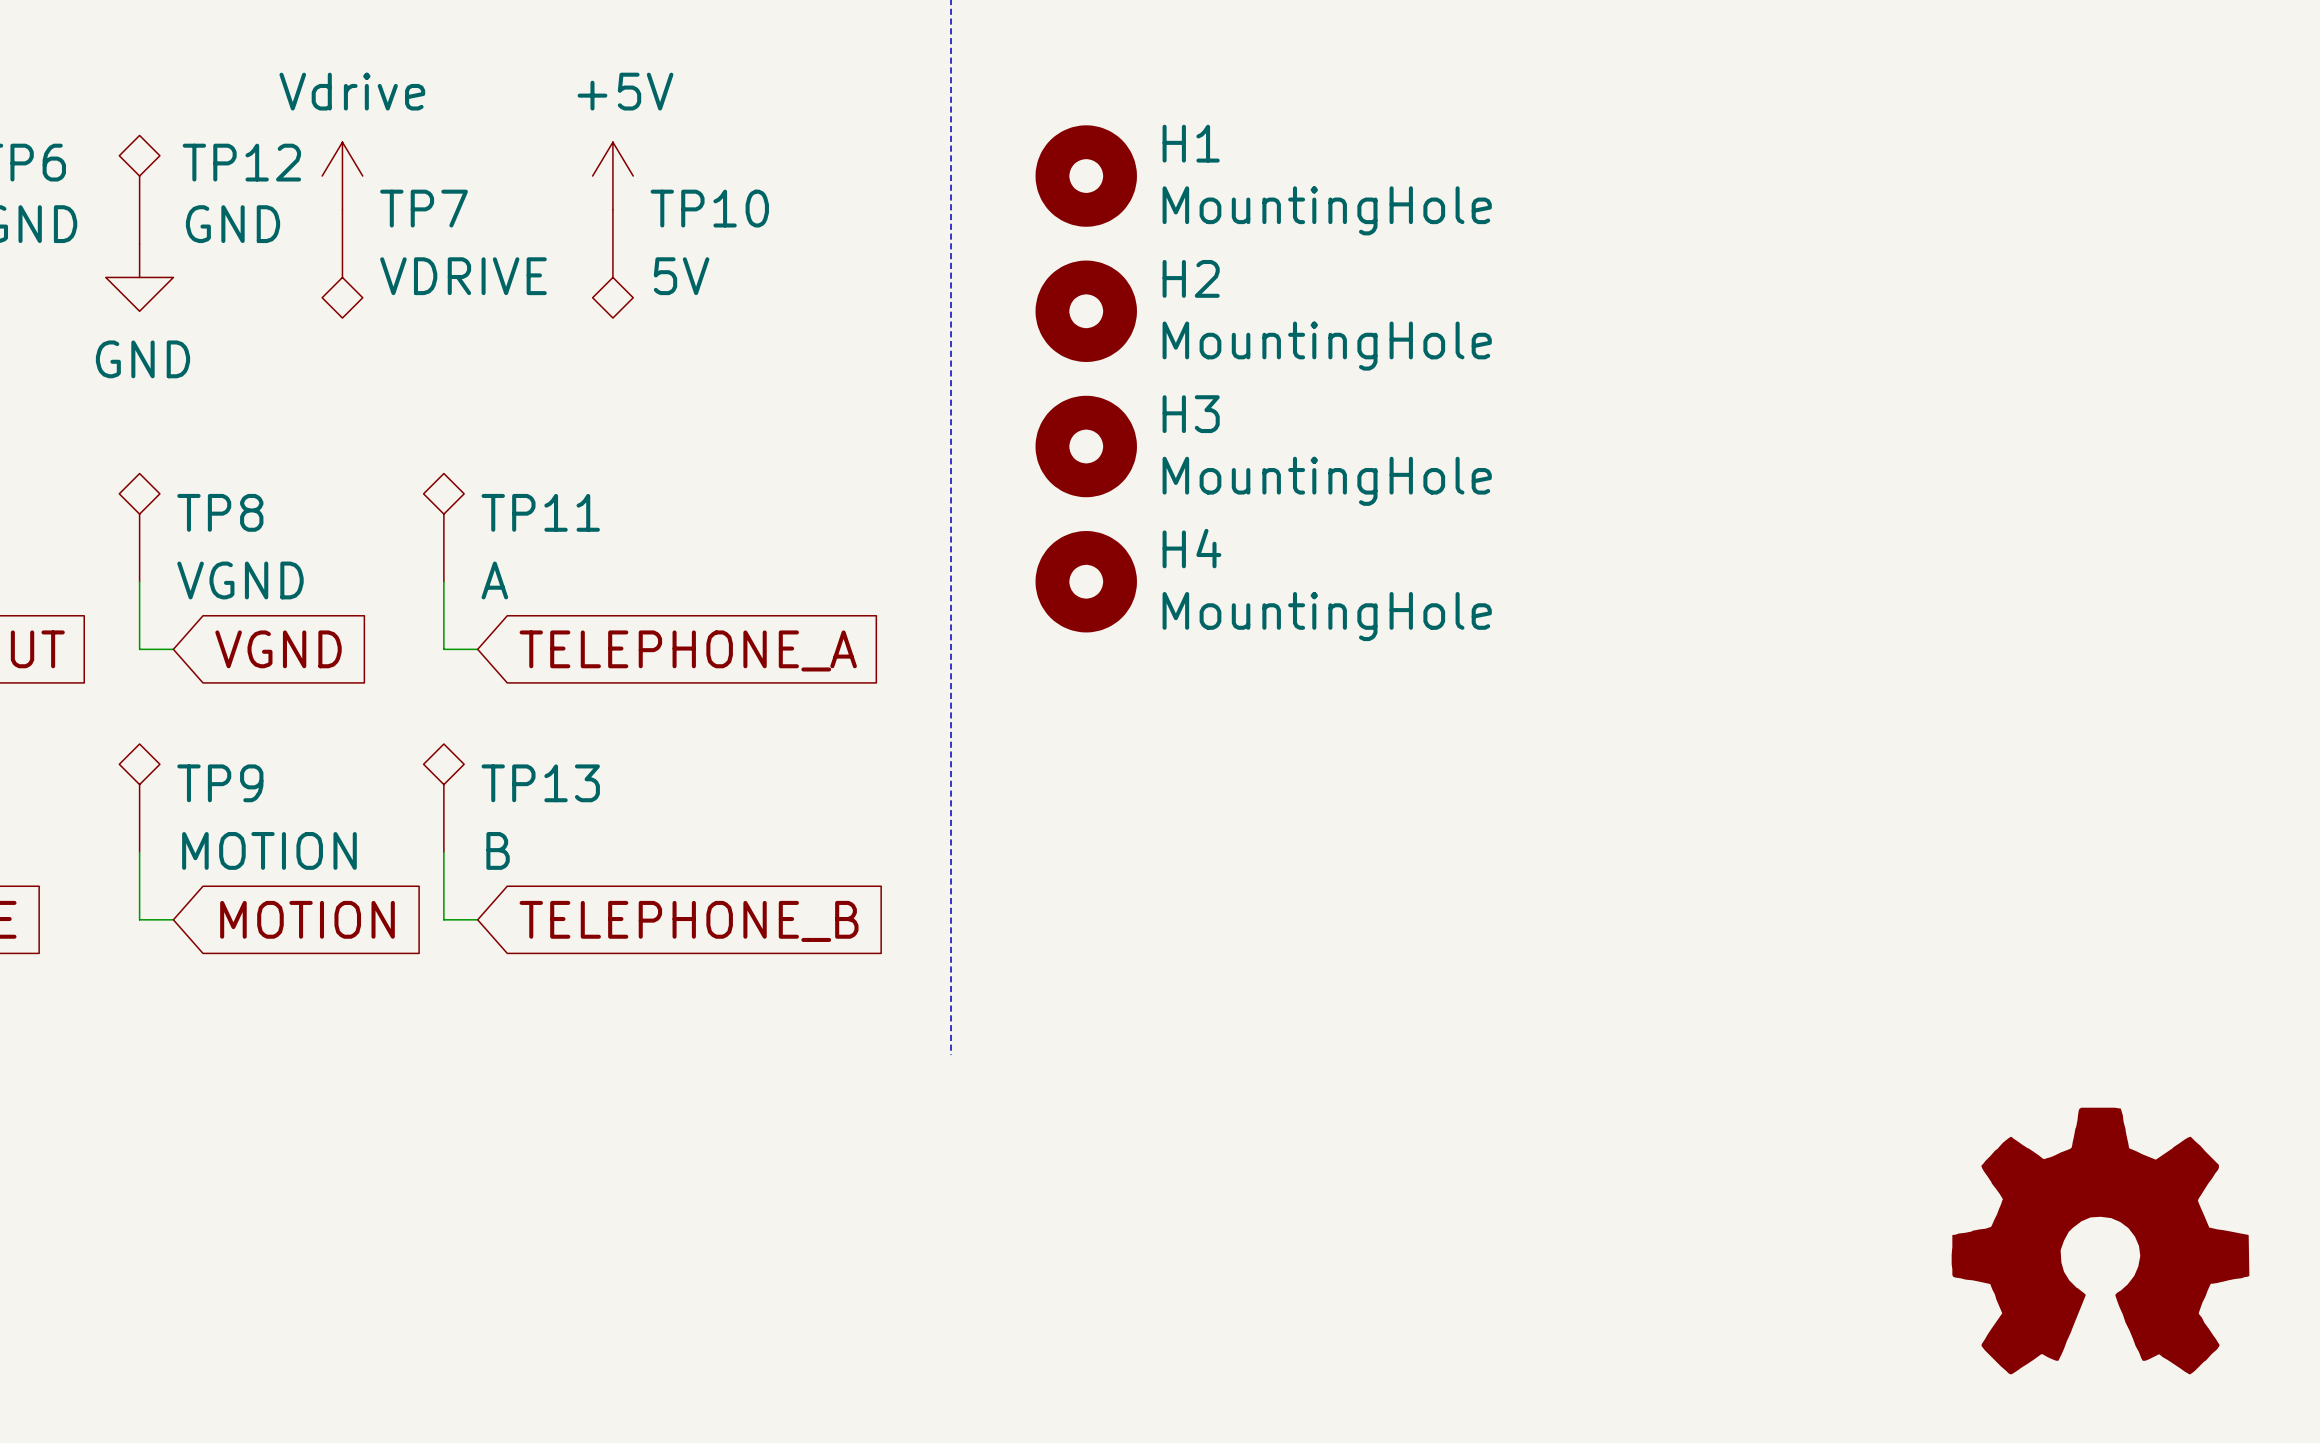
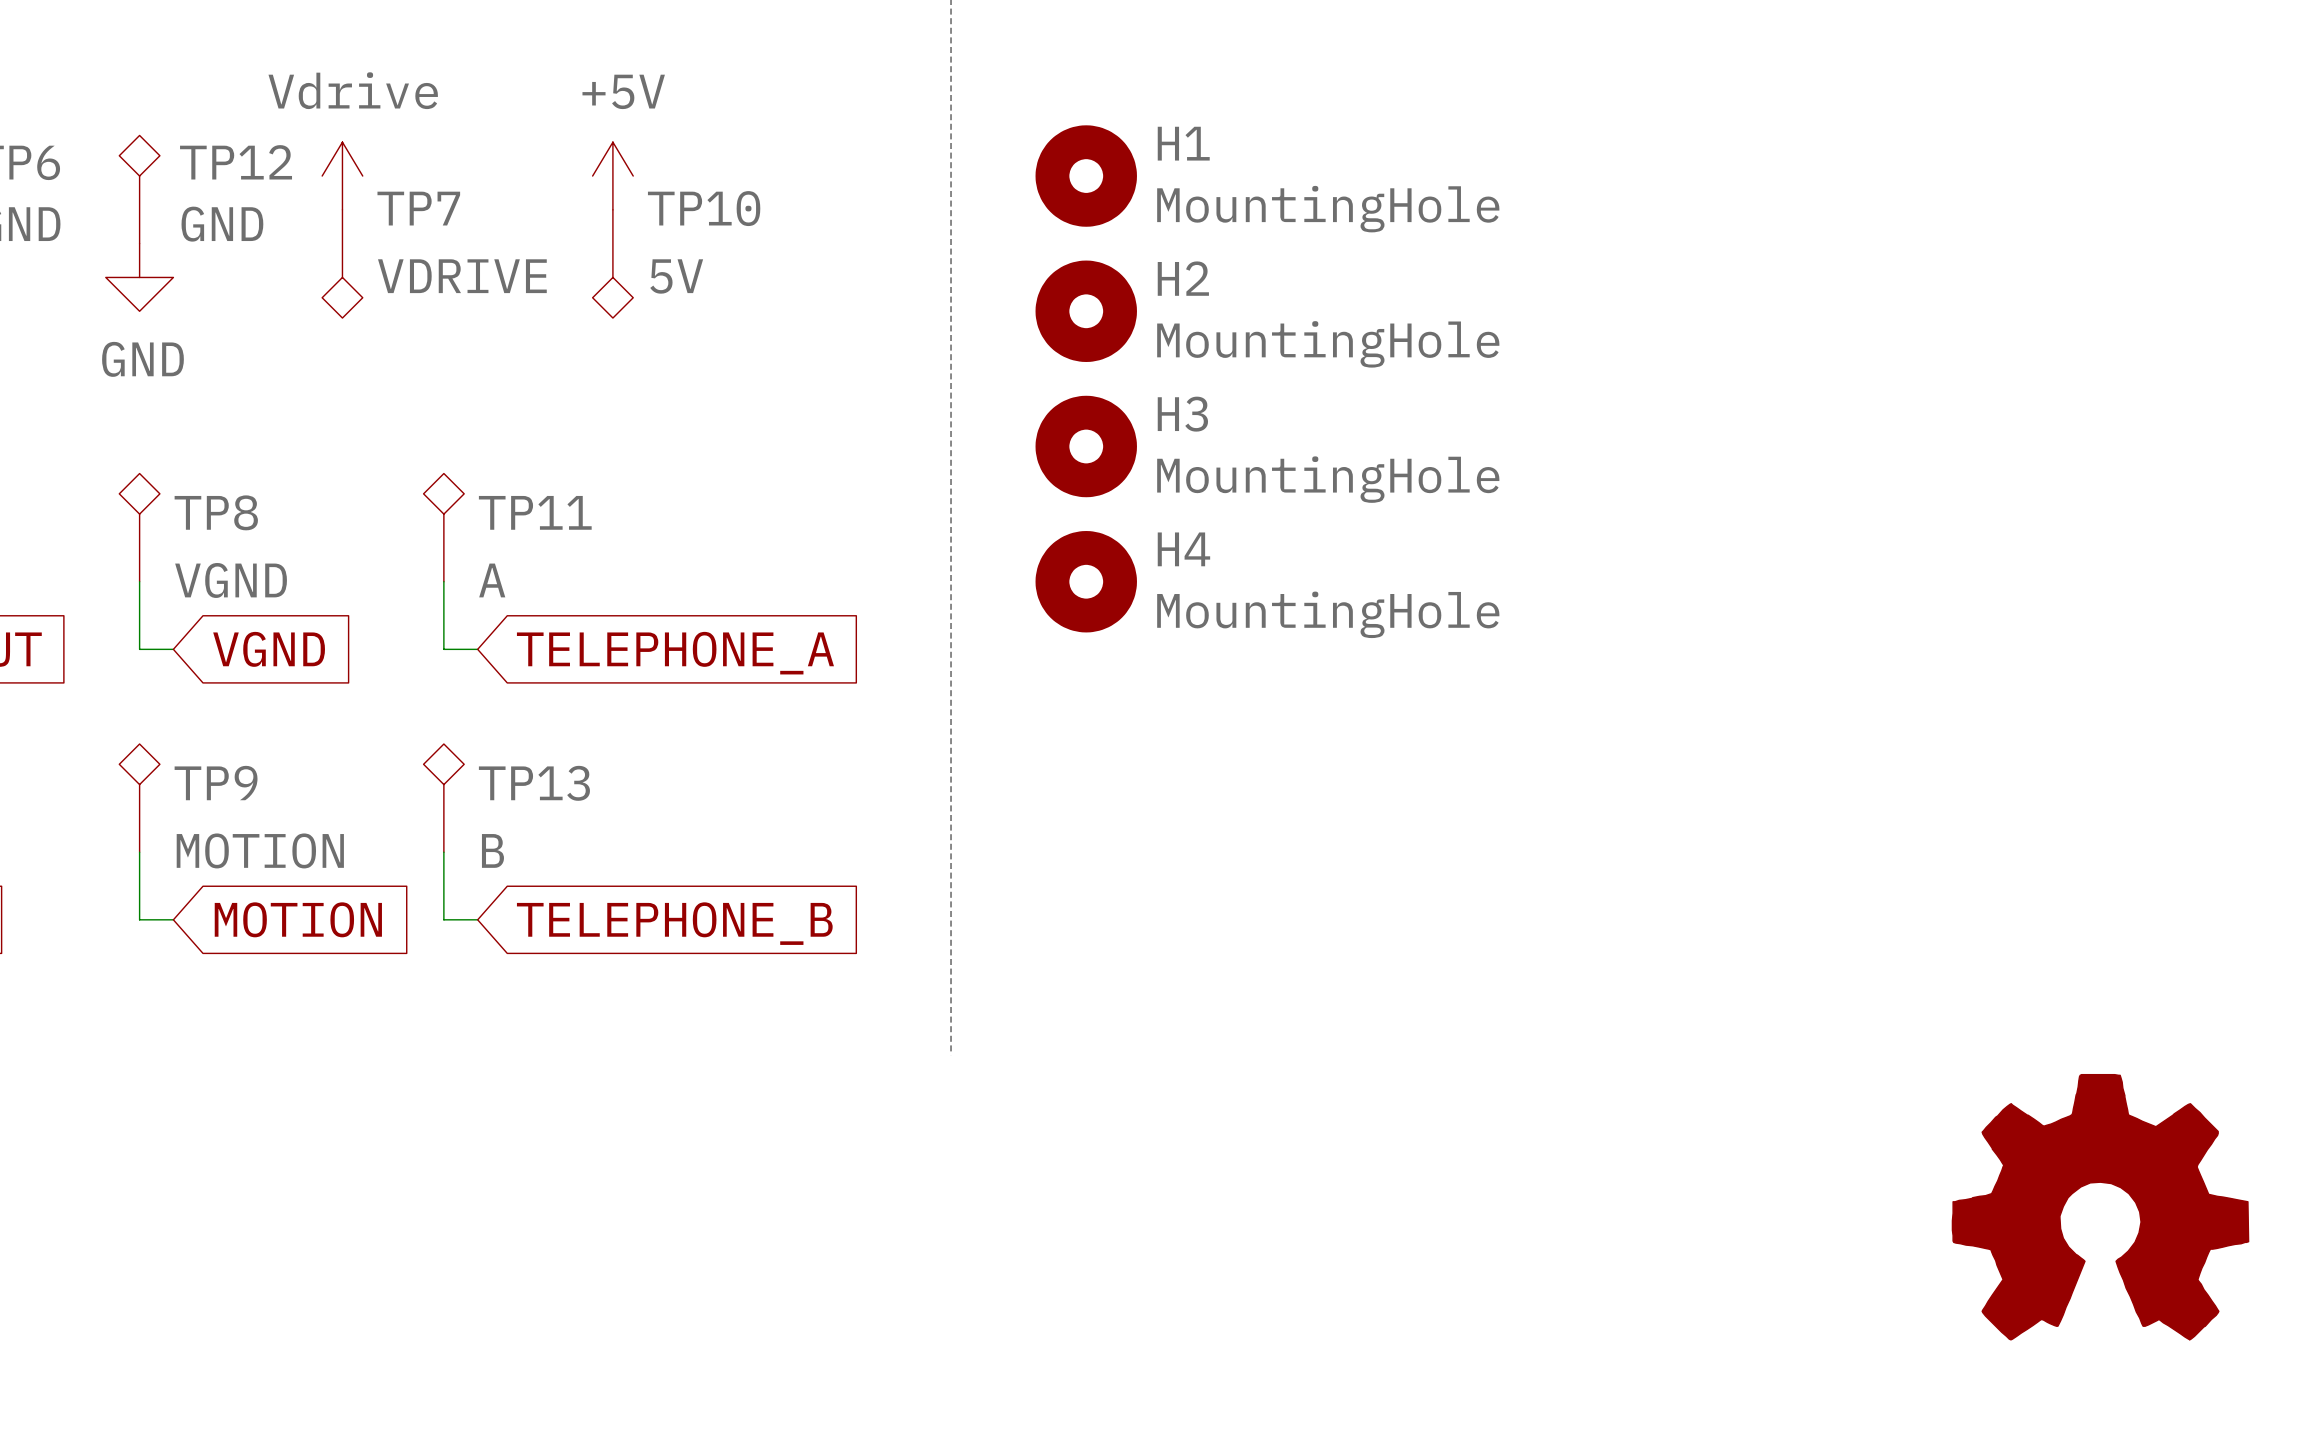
part position: (2100, 1241) -> (2100, 1207)

